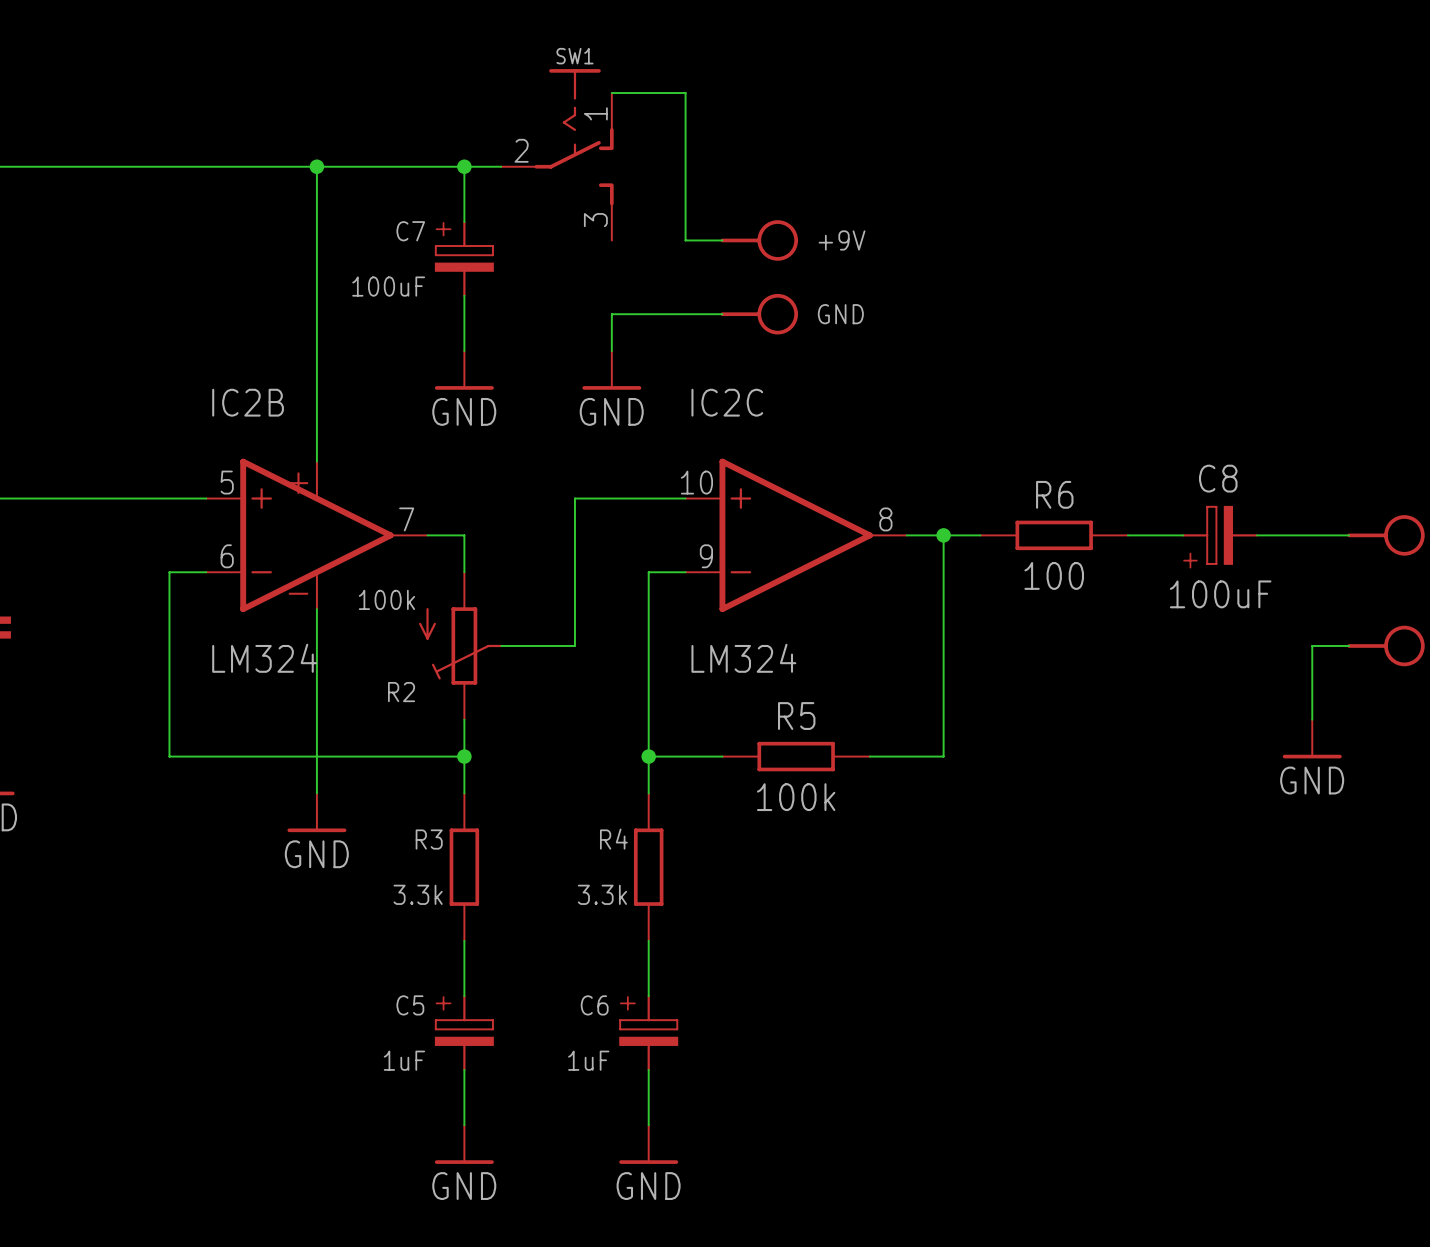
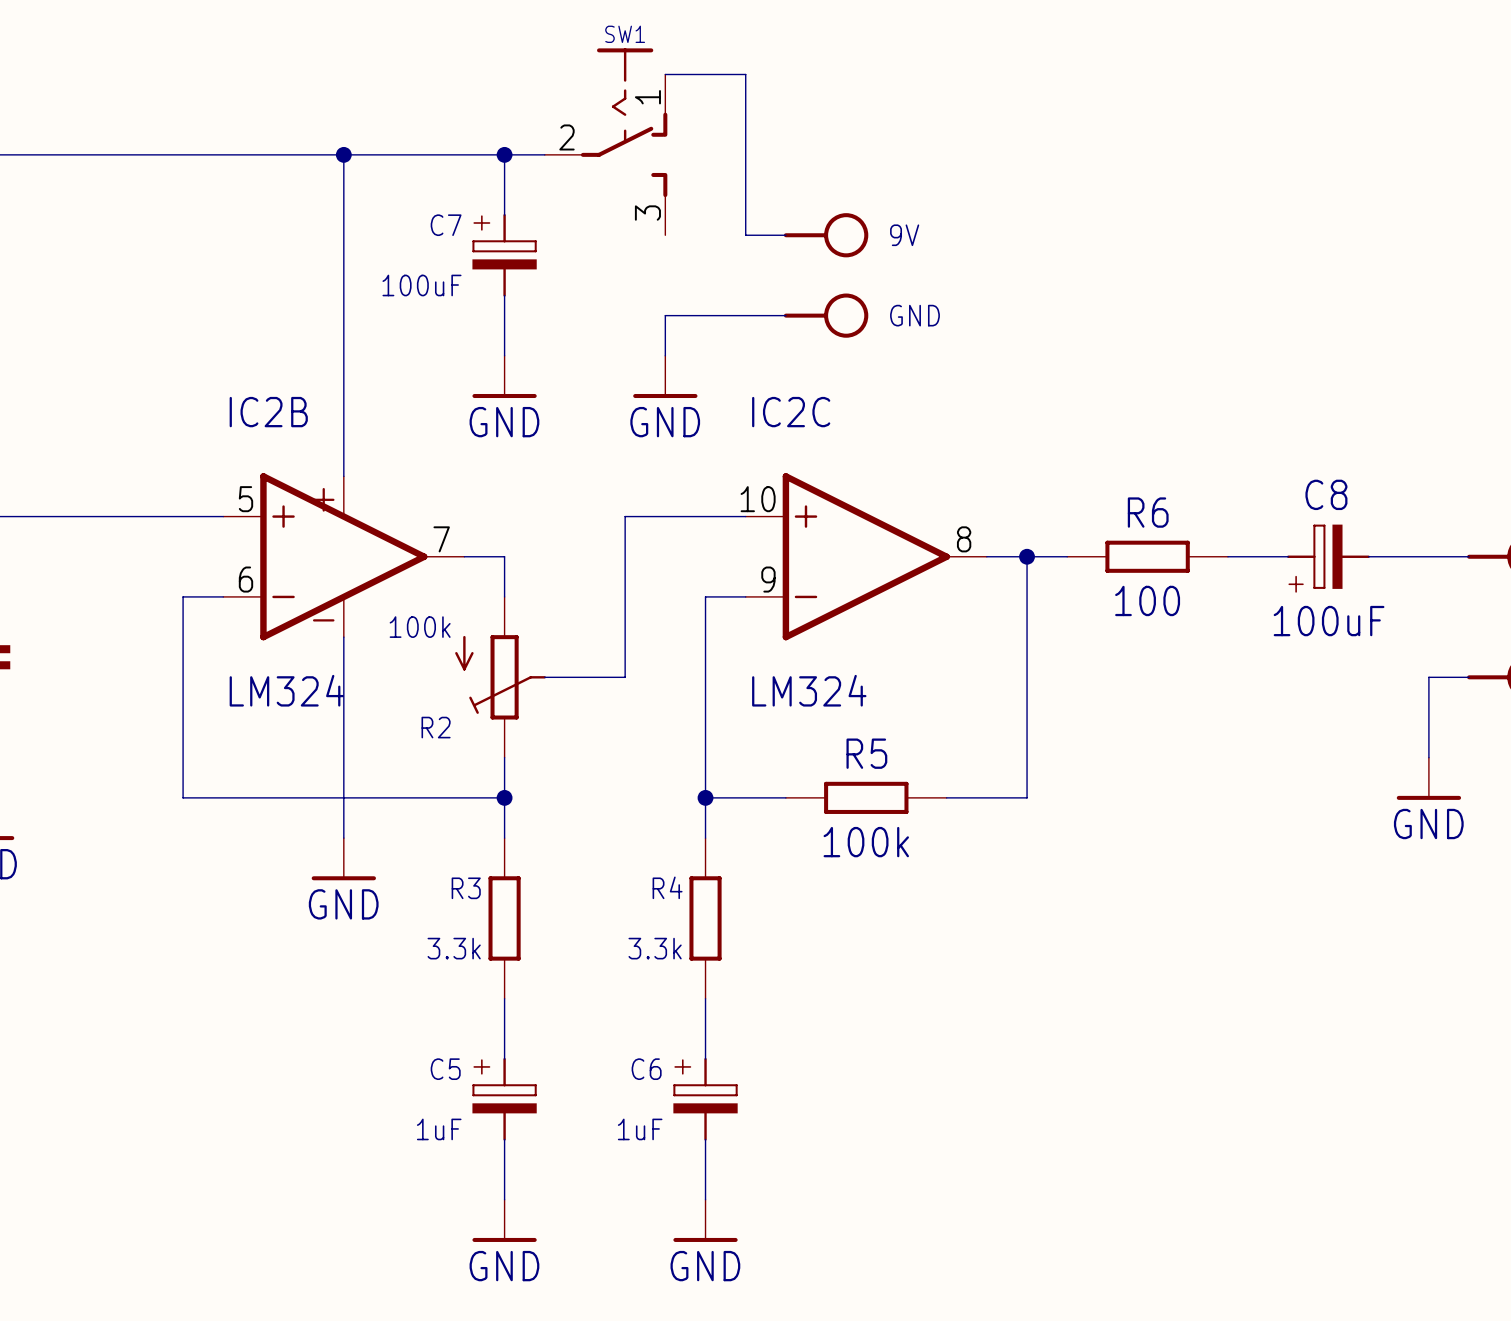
+9V name: +9V (842, 240) -> 9V (904, 235)

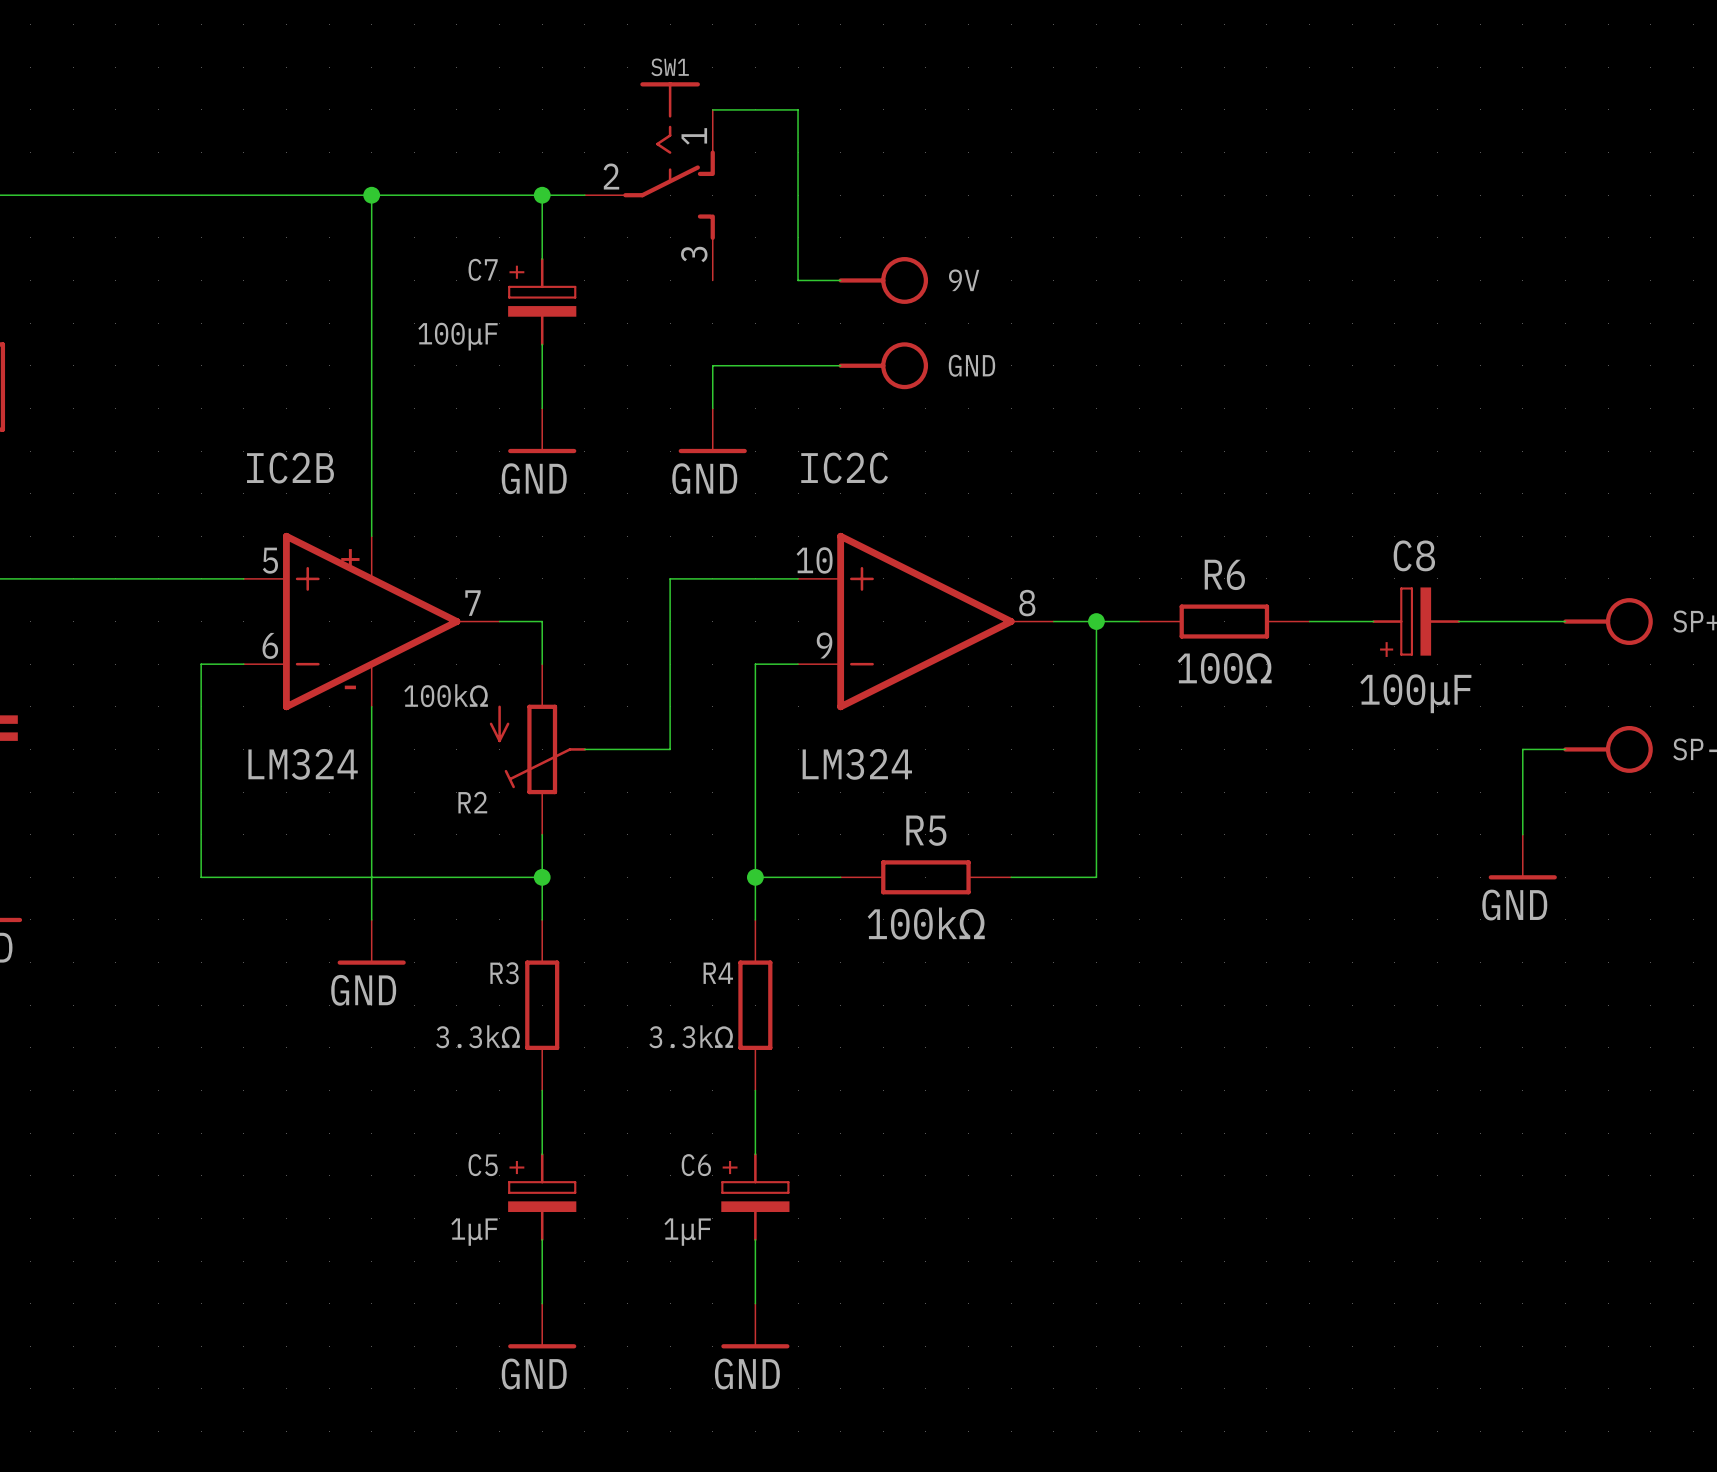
C7 value: 100uF (421, 285) -> 100μF (457, 336)
R6 value: 100 (1147, 600) -> 100Ω (1224, 668)
C8 value: 100uF (1329, 621) -> 100μF (1415, 693)
R2 value: 100k (420, 627) -> 100kΩ (446, 695)
R5 value: 100k (866, 842) -> 100kΩ (926, 923)
R3 value: 3.3k (454, 948) -> 3.3kΩ (478, 1036)
R4 value: 3.3k (655, 948) -> 3.3kΩ (691, 1036)
C5 value: 1uF (439, 1129) -> 1μF (474, 1232)
C6 value: 1uF (640, 1129) -> 1μF (687, 1232)

